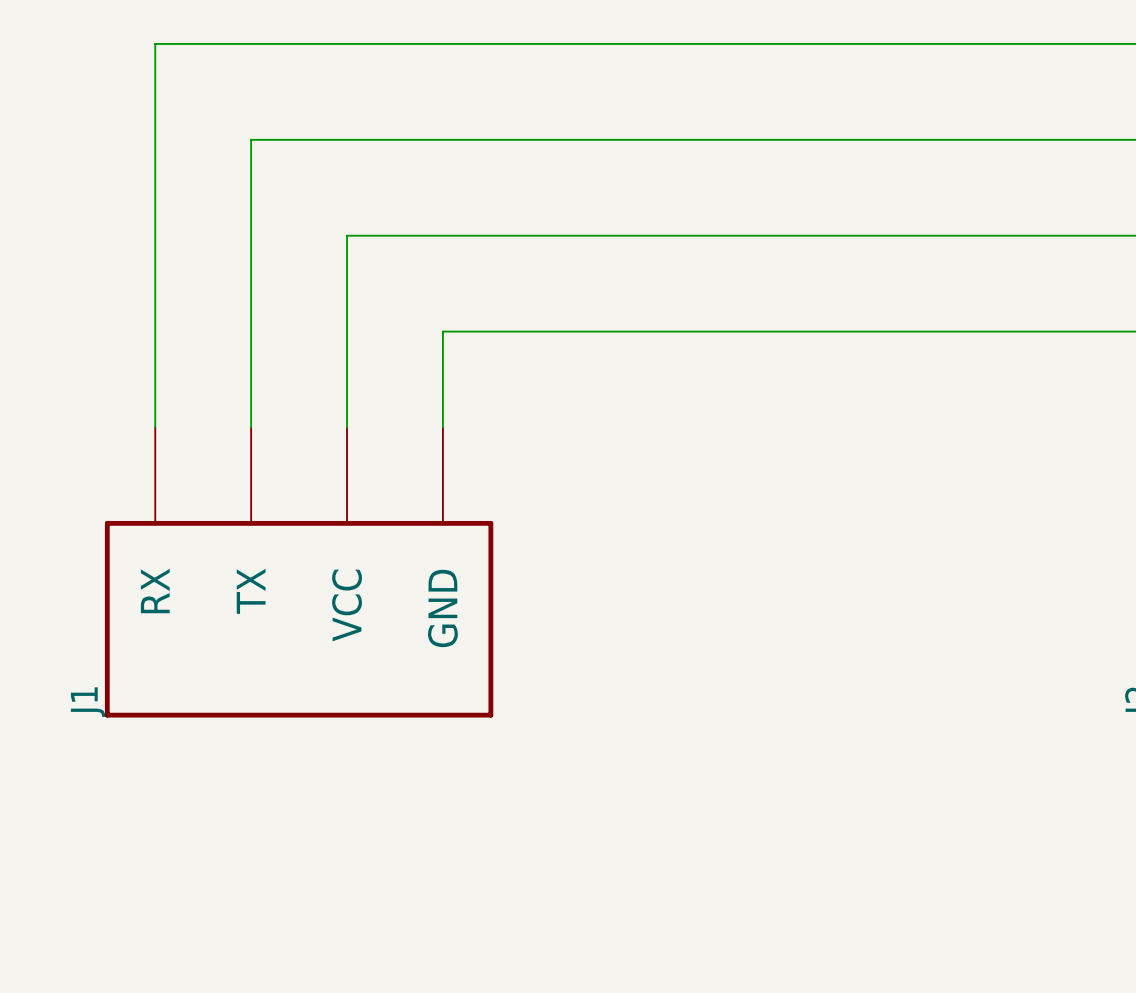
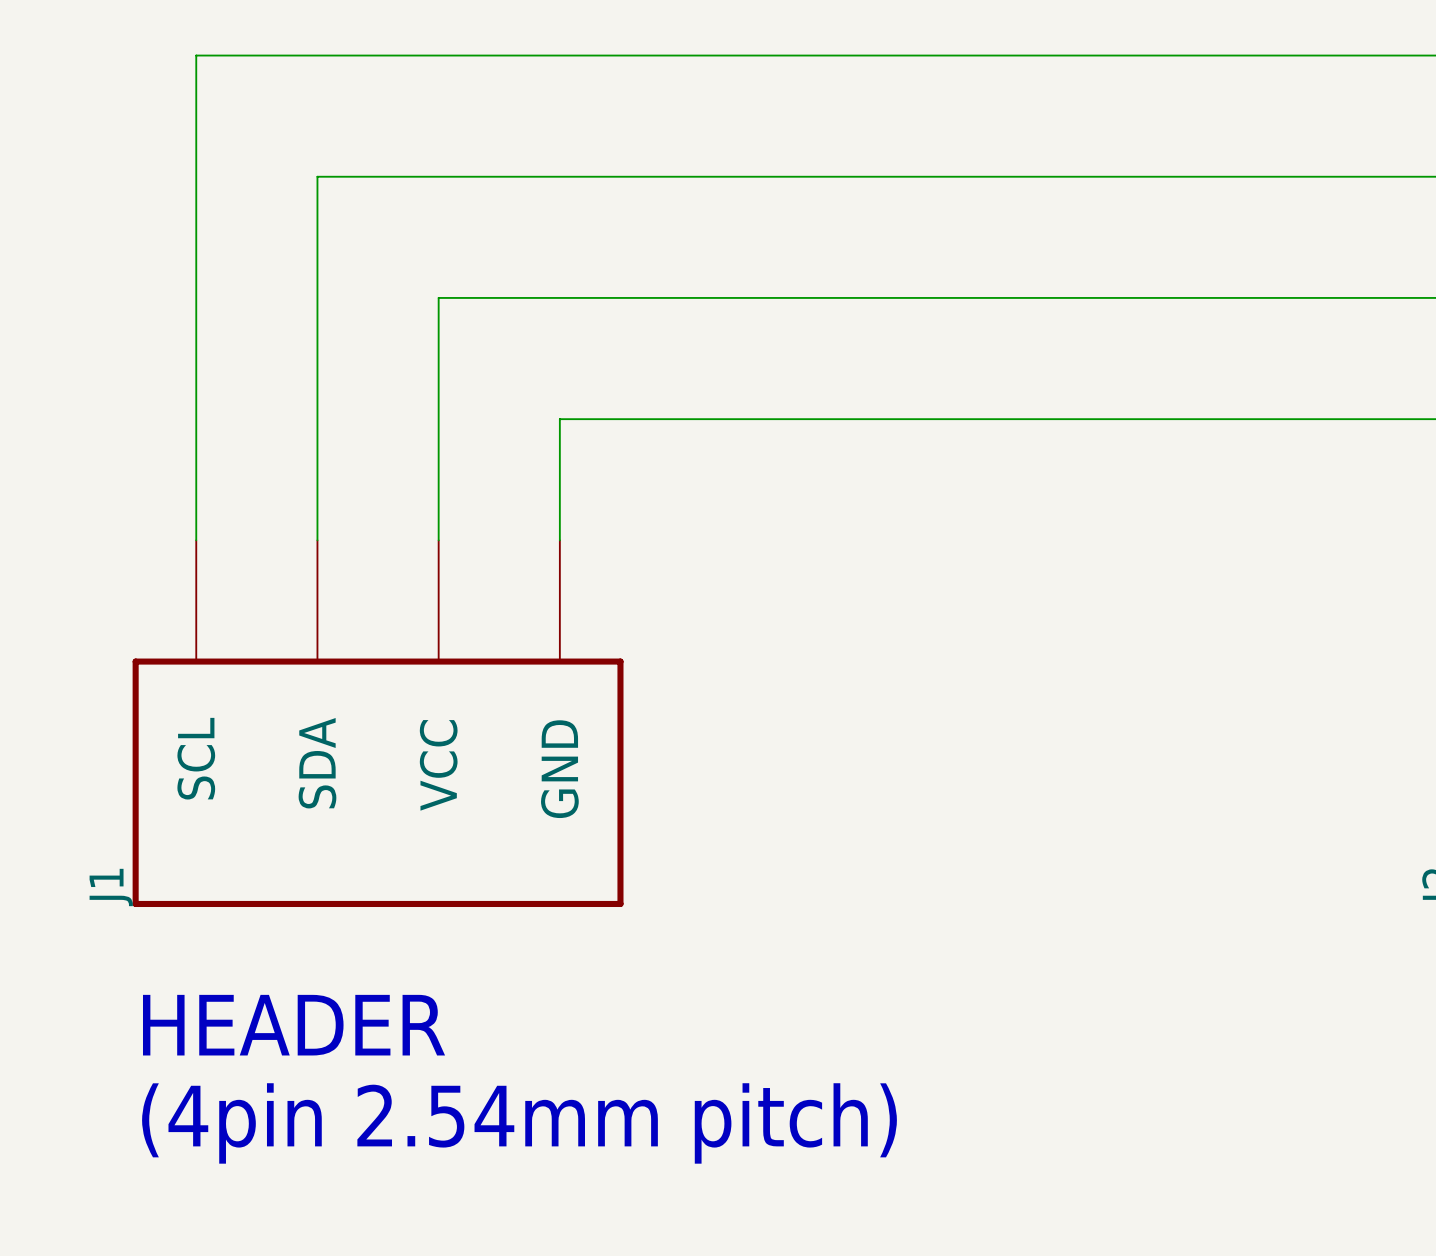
J1 pin name: RX (155, 591) -> SCL (196, 758)
J1 pin name: TX (251, 591) -> SDA (317, 763)
text: none -> HEADER (294, 1025)
text: none -> (4pin 2.54mm pitch) (519, 1123)

